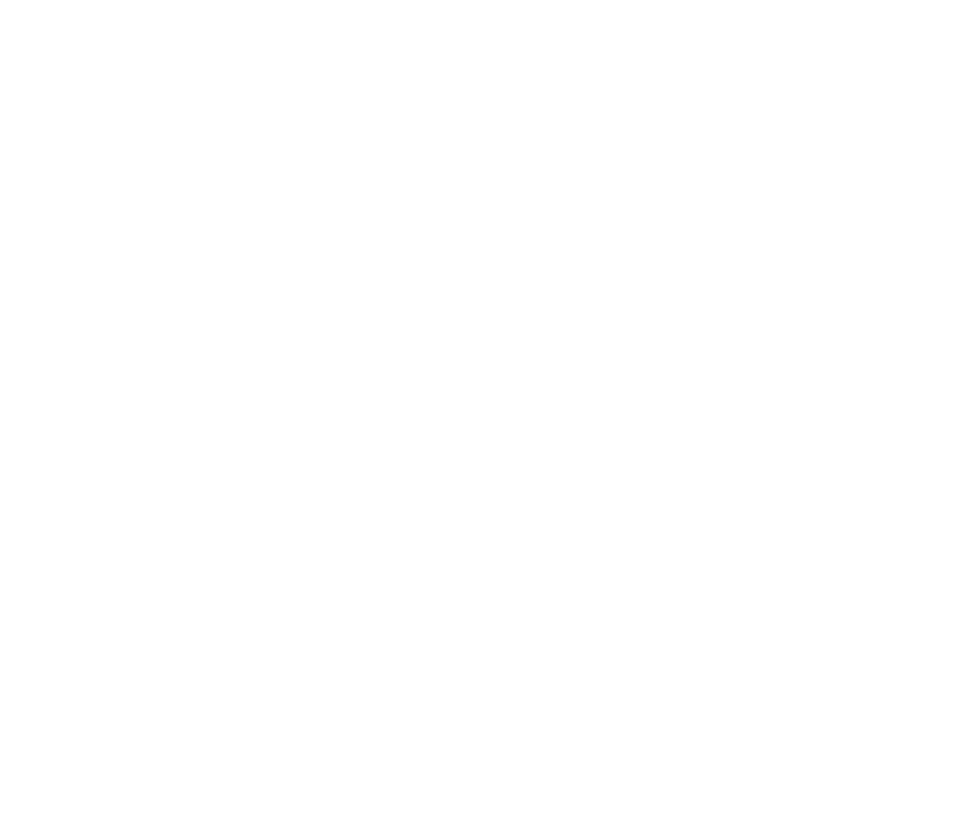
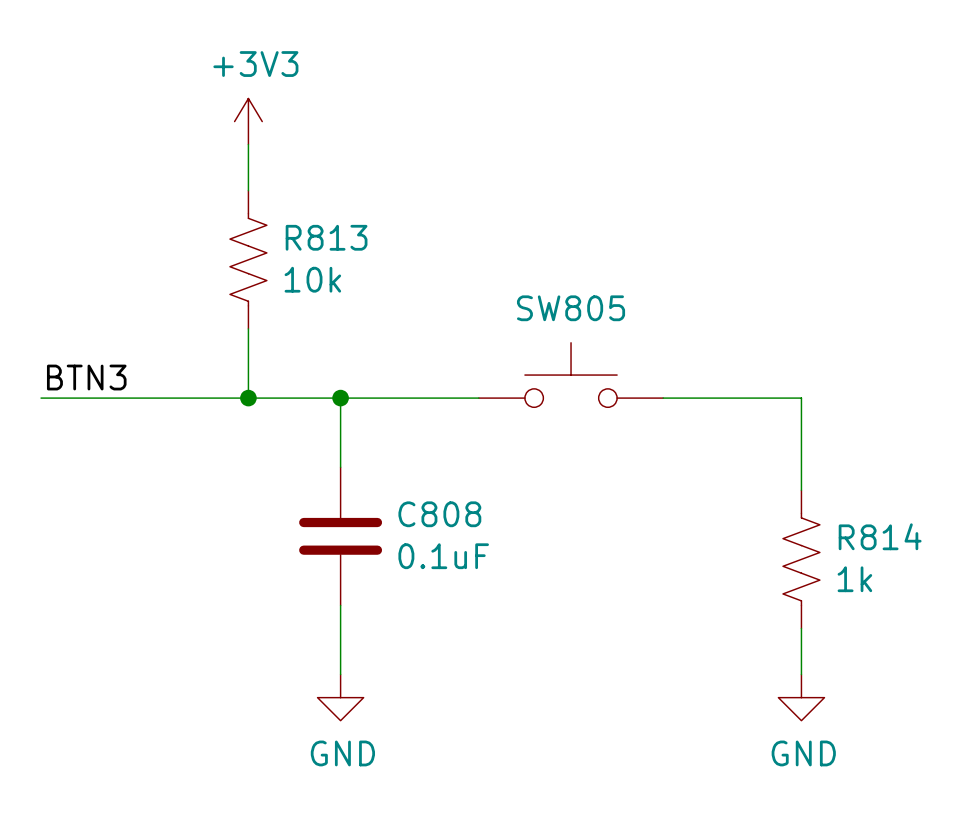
power symbol: none -> +3V3 (248, 121)
wire: none -> (248, 144) (248, 190)
R813: none -> 10k (248, 259)
wire: none -> (248, 328) (248, 398)
SW805: none -> (571, 375)
label: none -> BTN3 (86, 377)
wire: none -> (41, 398) (478, 398)
junction: none -> (248, 398)
wire: none -> (340, 398) (340, 467)
junction: none -> (340, 398)
wire: none -> (663, 398) (801, 398) (801, 490)
C808: none -> 0.1uF (340, 536)
R814: none -> 1k (801, 559)
wire: none -> (340, 605) (340, 674)
wire: none -> (801, 628) (801, 674)
power symbol: none -> GND (340, 697)
power symbol: none -> GND (801, 697)

